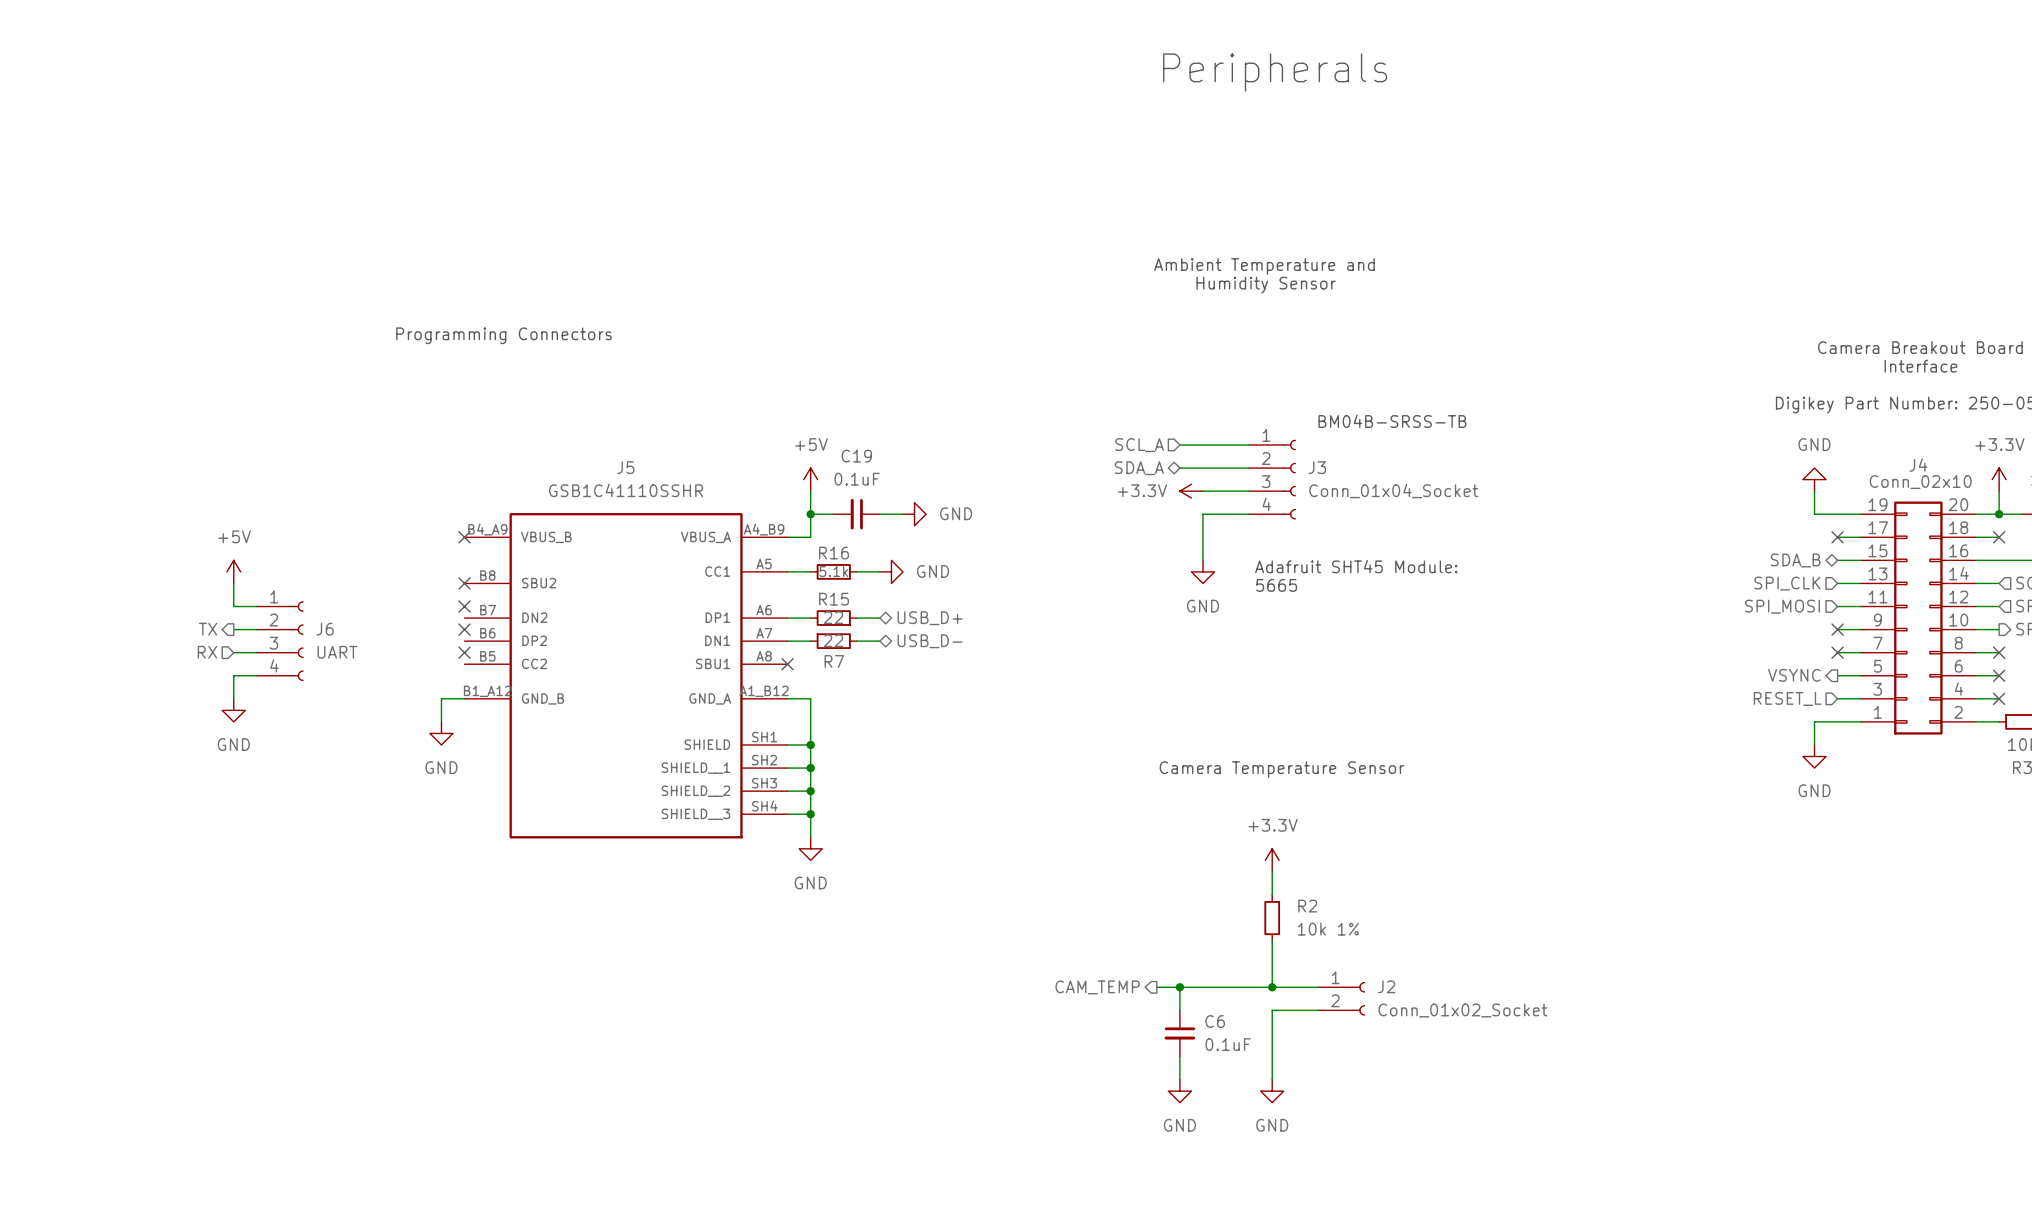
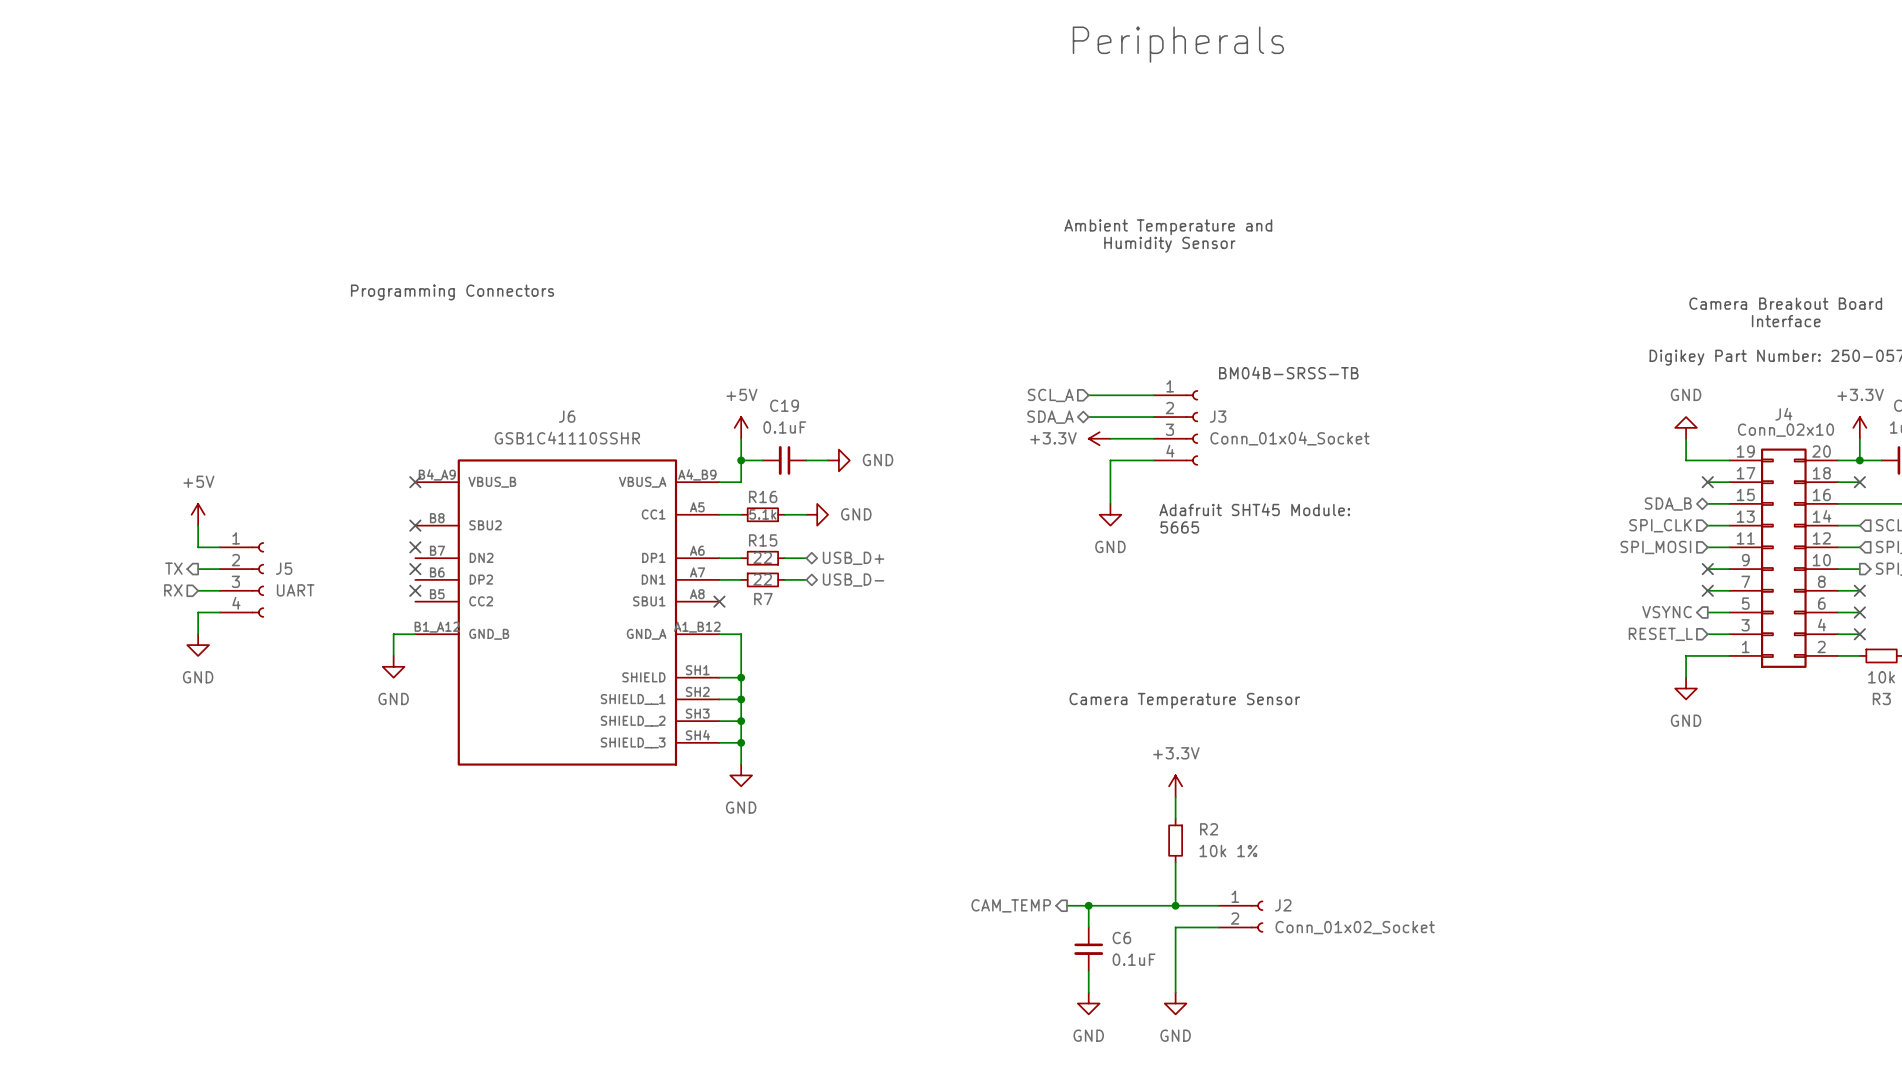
J5 name: J5 (625, 467) -> J6 (567, 416)
J6 name: J6 (325, 629) -> J5 (284, 568)

